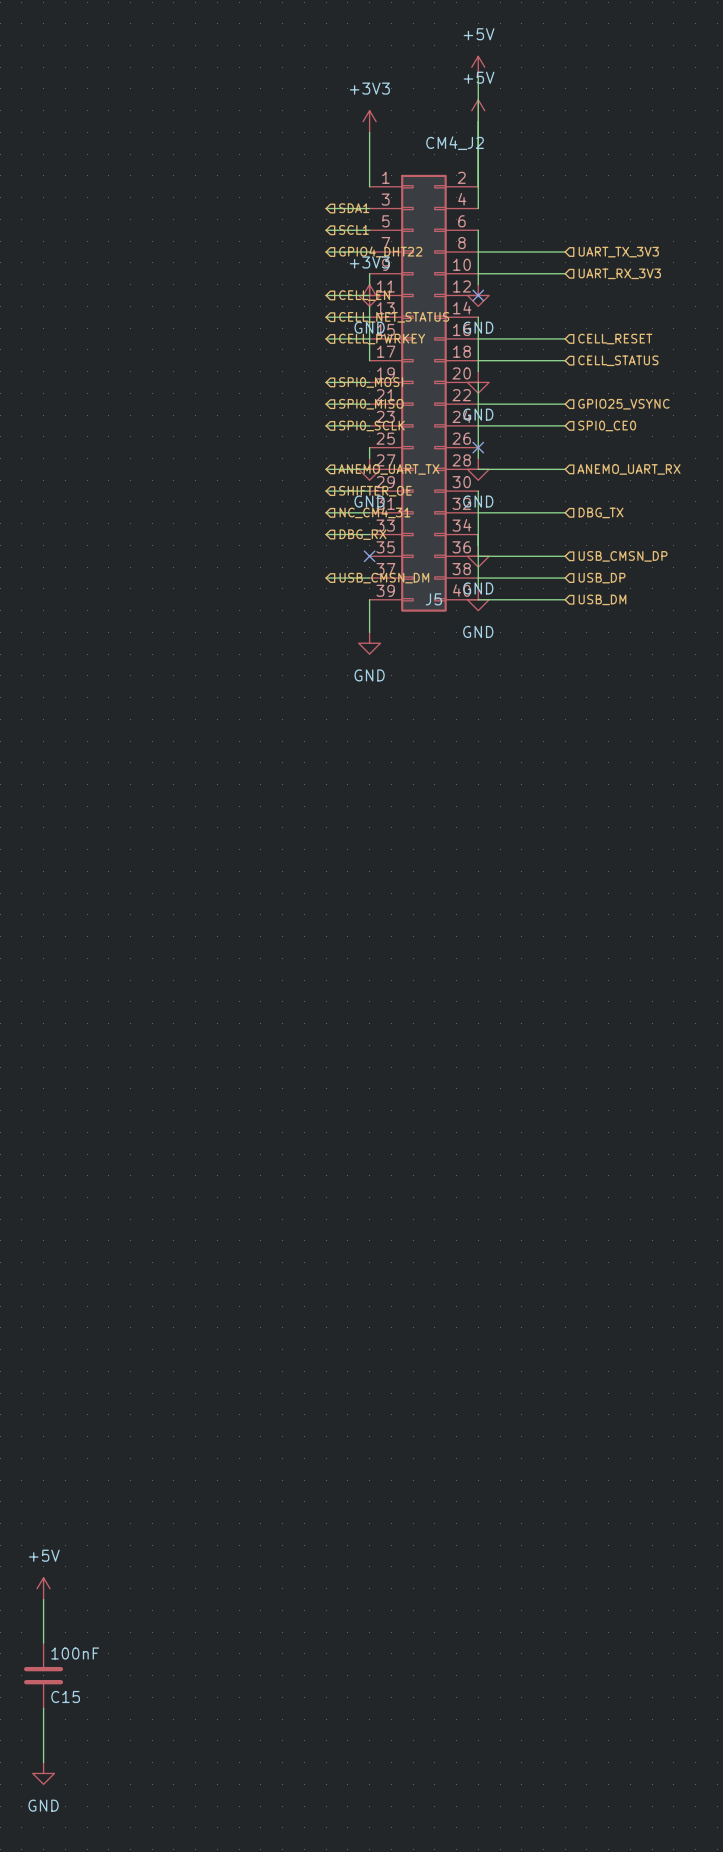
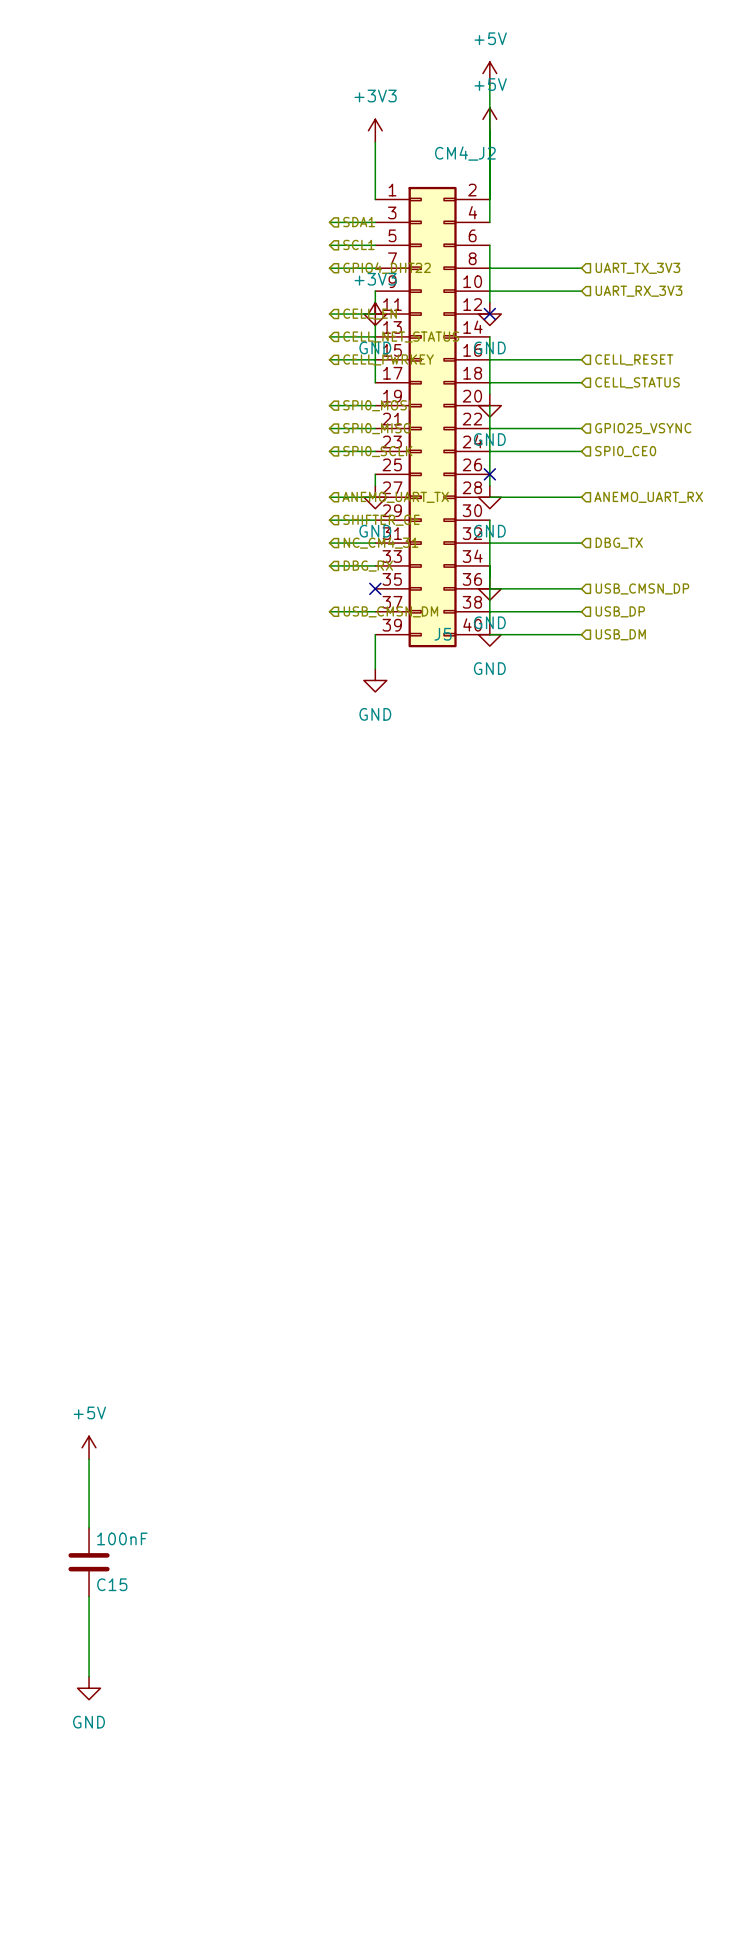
power symbol: none -> +5V (89, 1447)
wire: none -> (89, 1459) (89, 1527)
wire: none -> (89, 1596) (89, 1676)
power symbol: +5V (43, 1588) -> none
wire: (43, 1599) (43, 1643) -> none
C15 position: (43, 1675) -> (89, 1562)
wire: (43, 1708) (43, 1762) -> none
power symbol position: GND (43, 1773) -> GND (89, 1688)

